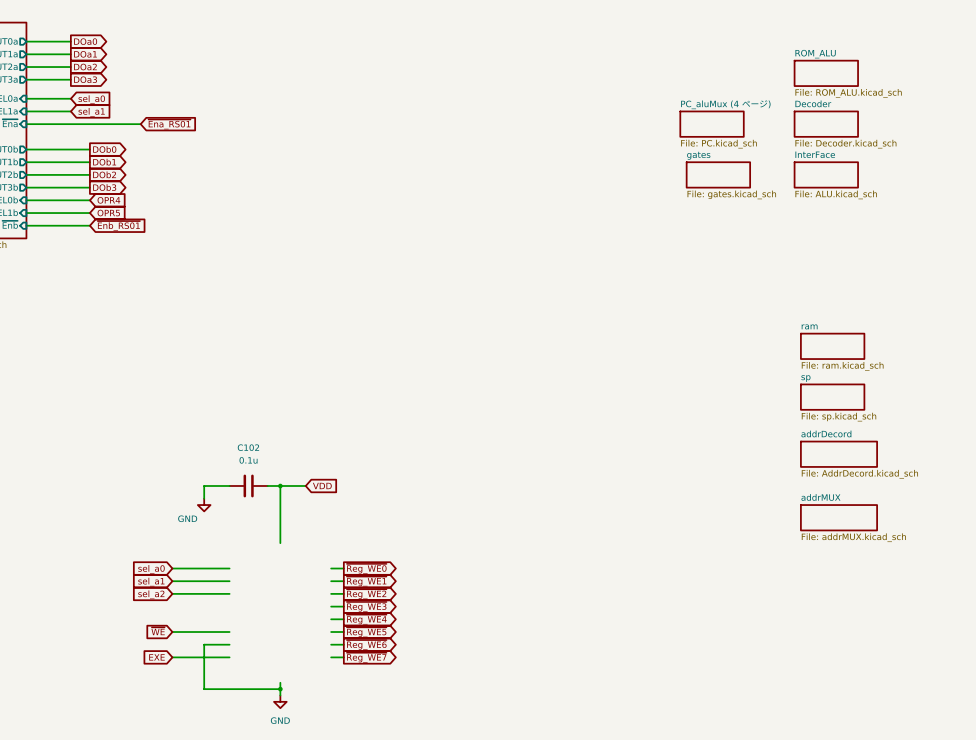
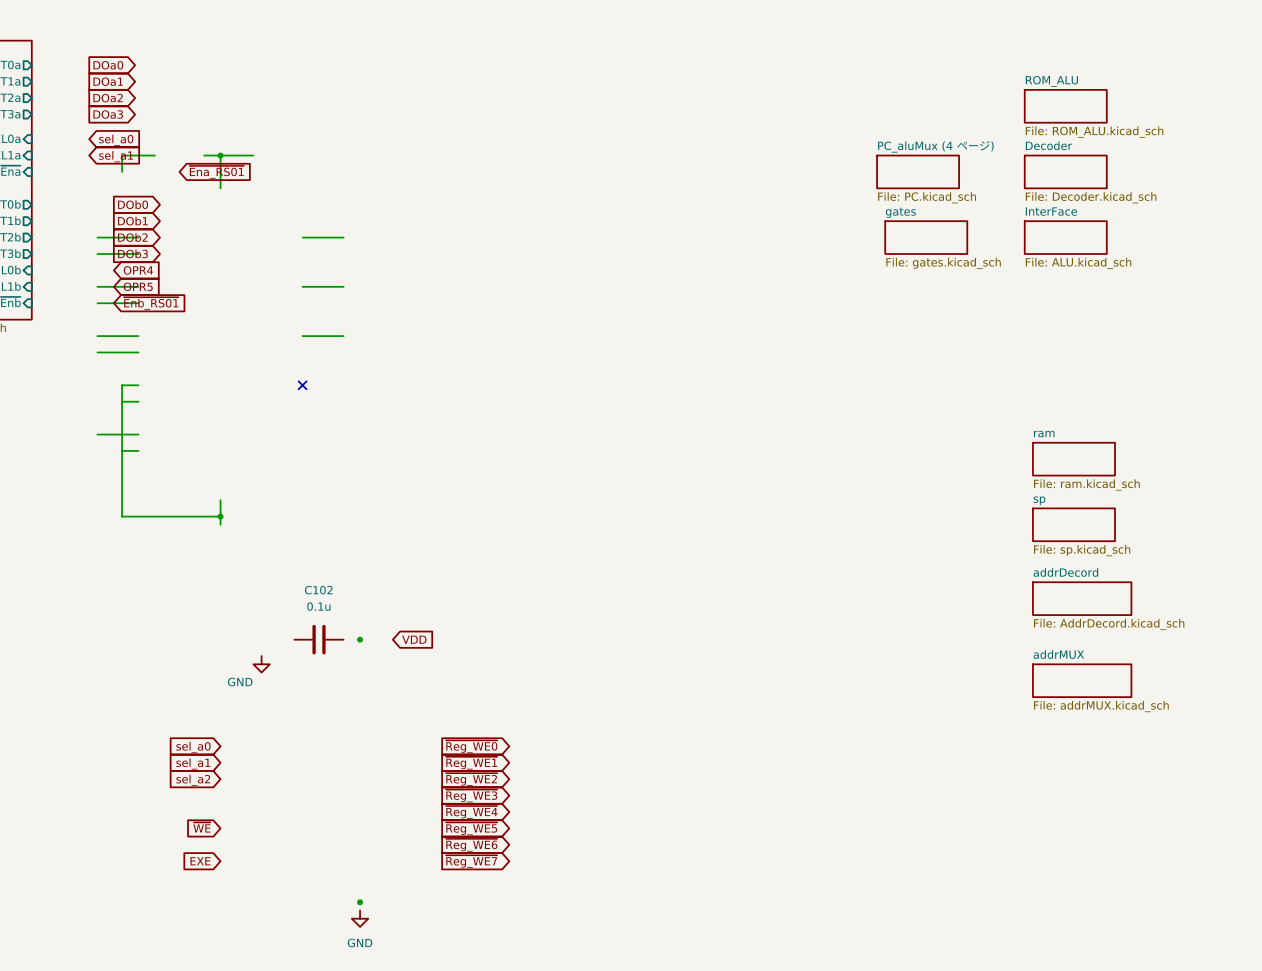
wire: (26, 41) (70, 41) -> none
wire: (26, 54) (70, 54) -> none
wire: (26, 67) (70, 67) -> none
wire: (26, 79) (70, 79) -> none
wire: (26, 98) (70, 98) -> none
wire: (26, 111) (70, 111) -> none
wire: none -> (154, 155) (122, 155) (122, 171)
wire: none -> (204, 155) (253, 155)
wire: none -> (220, 155) (220, 188)
junction: none -> (220, 155)
wire: (26, 124) (140, 124) -> none
wire: (26, 149) (89, 149) -> none
wire: (26, 162) (89, 162) -> none
wire: (26, 174) (77, 174) -> none
wire: none -> (113, 237) (138, 237)
wire: none -> (302, 237) (343, 237)
wire: (26, 187) (77, 187) -> none
wire: none -> (113, 254) (138, 254)
wire: (26, 200) (89, 200) -> none
wire: (26, 213) (77, 213) -> none
wire: none -> (113, 286) (138, 286)
wire: none -> (302, 286) (343, 286)
wire: (26, 225) (77, 225) -> none
wire: none -> (113, 303) (138, 303)
wire: none -> (97, 336) (138, 336)
wire: none -> (302, 336) (343, 336)
wire: none -> (97, 352) (138, 352)
wire: none -> (138, 385) (122, 385) (122, 516) (220, 516)
no-connect mark: none -> (302, 385)
wire: none -> (122, 401) (138, 401)
wire: none -> (97, 434) (138, 434)
wire: none -> (122, 450) (138, 450)
wire: none -> (220, 500) (220, 524)
junction: none -> (220, 516)
wire: (229, 485) (204, 485) (204, 498) -> none
wire: (267, 485) (305, 485) -> none
wire: (280, 485) (280, 543) -> none
wire: (172, 568) (229, 568) -> none
wire: (331, 568) (343, 568) -> none
wire: (172, 581) (229, 581) -> none
wire: (331, 581) (343, 581) -> none
wire: (172, 593) (229, 593) -> none
wire: (331, 593) (343, 593) -> none
wire: (331, 606) (343, 606) -> none
wire: (331, 619) (343, 619) -> none
wire: (172, 632) (229, 632) -> none
wire: (331, 632) (343, 632) -> none
wire: (229, 644) (204, 644) (204, 689) (280, 689) -> none
wire: (331, 644) (343, 644) -> none
wire: (172, 657) (229, 657) -> none
wire: (331, 657) (343, 657) -> none
wire: (280, 682) (280, 695) -> none

